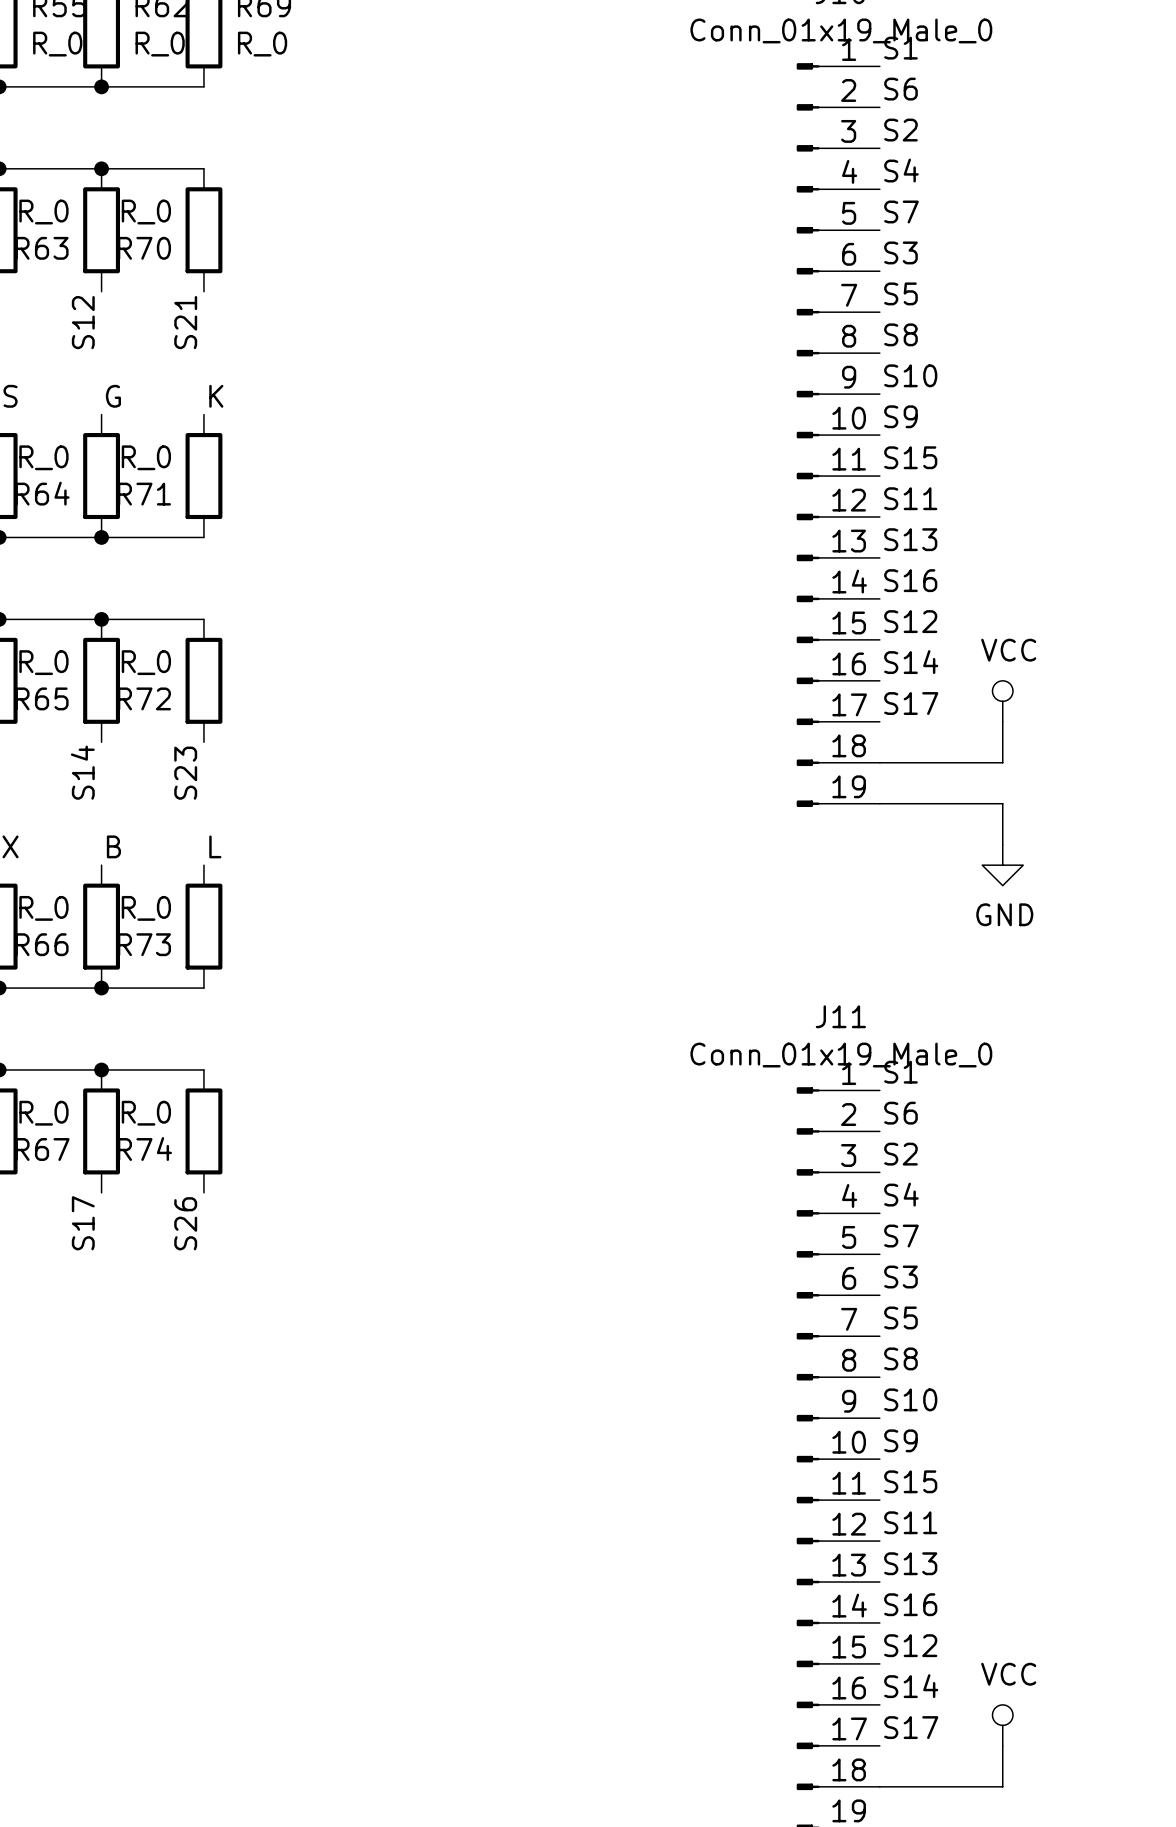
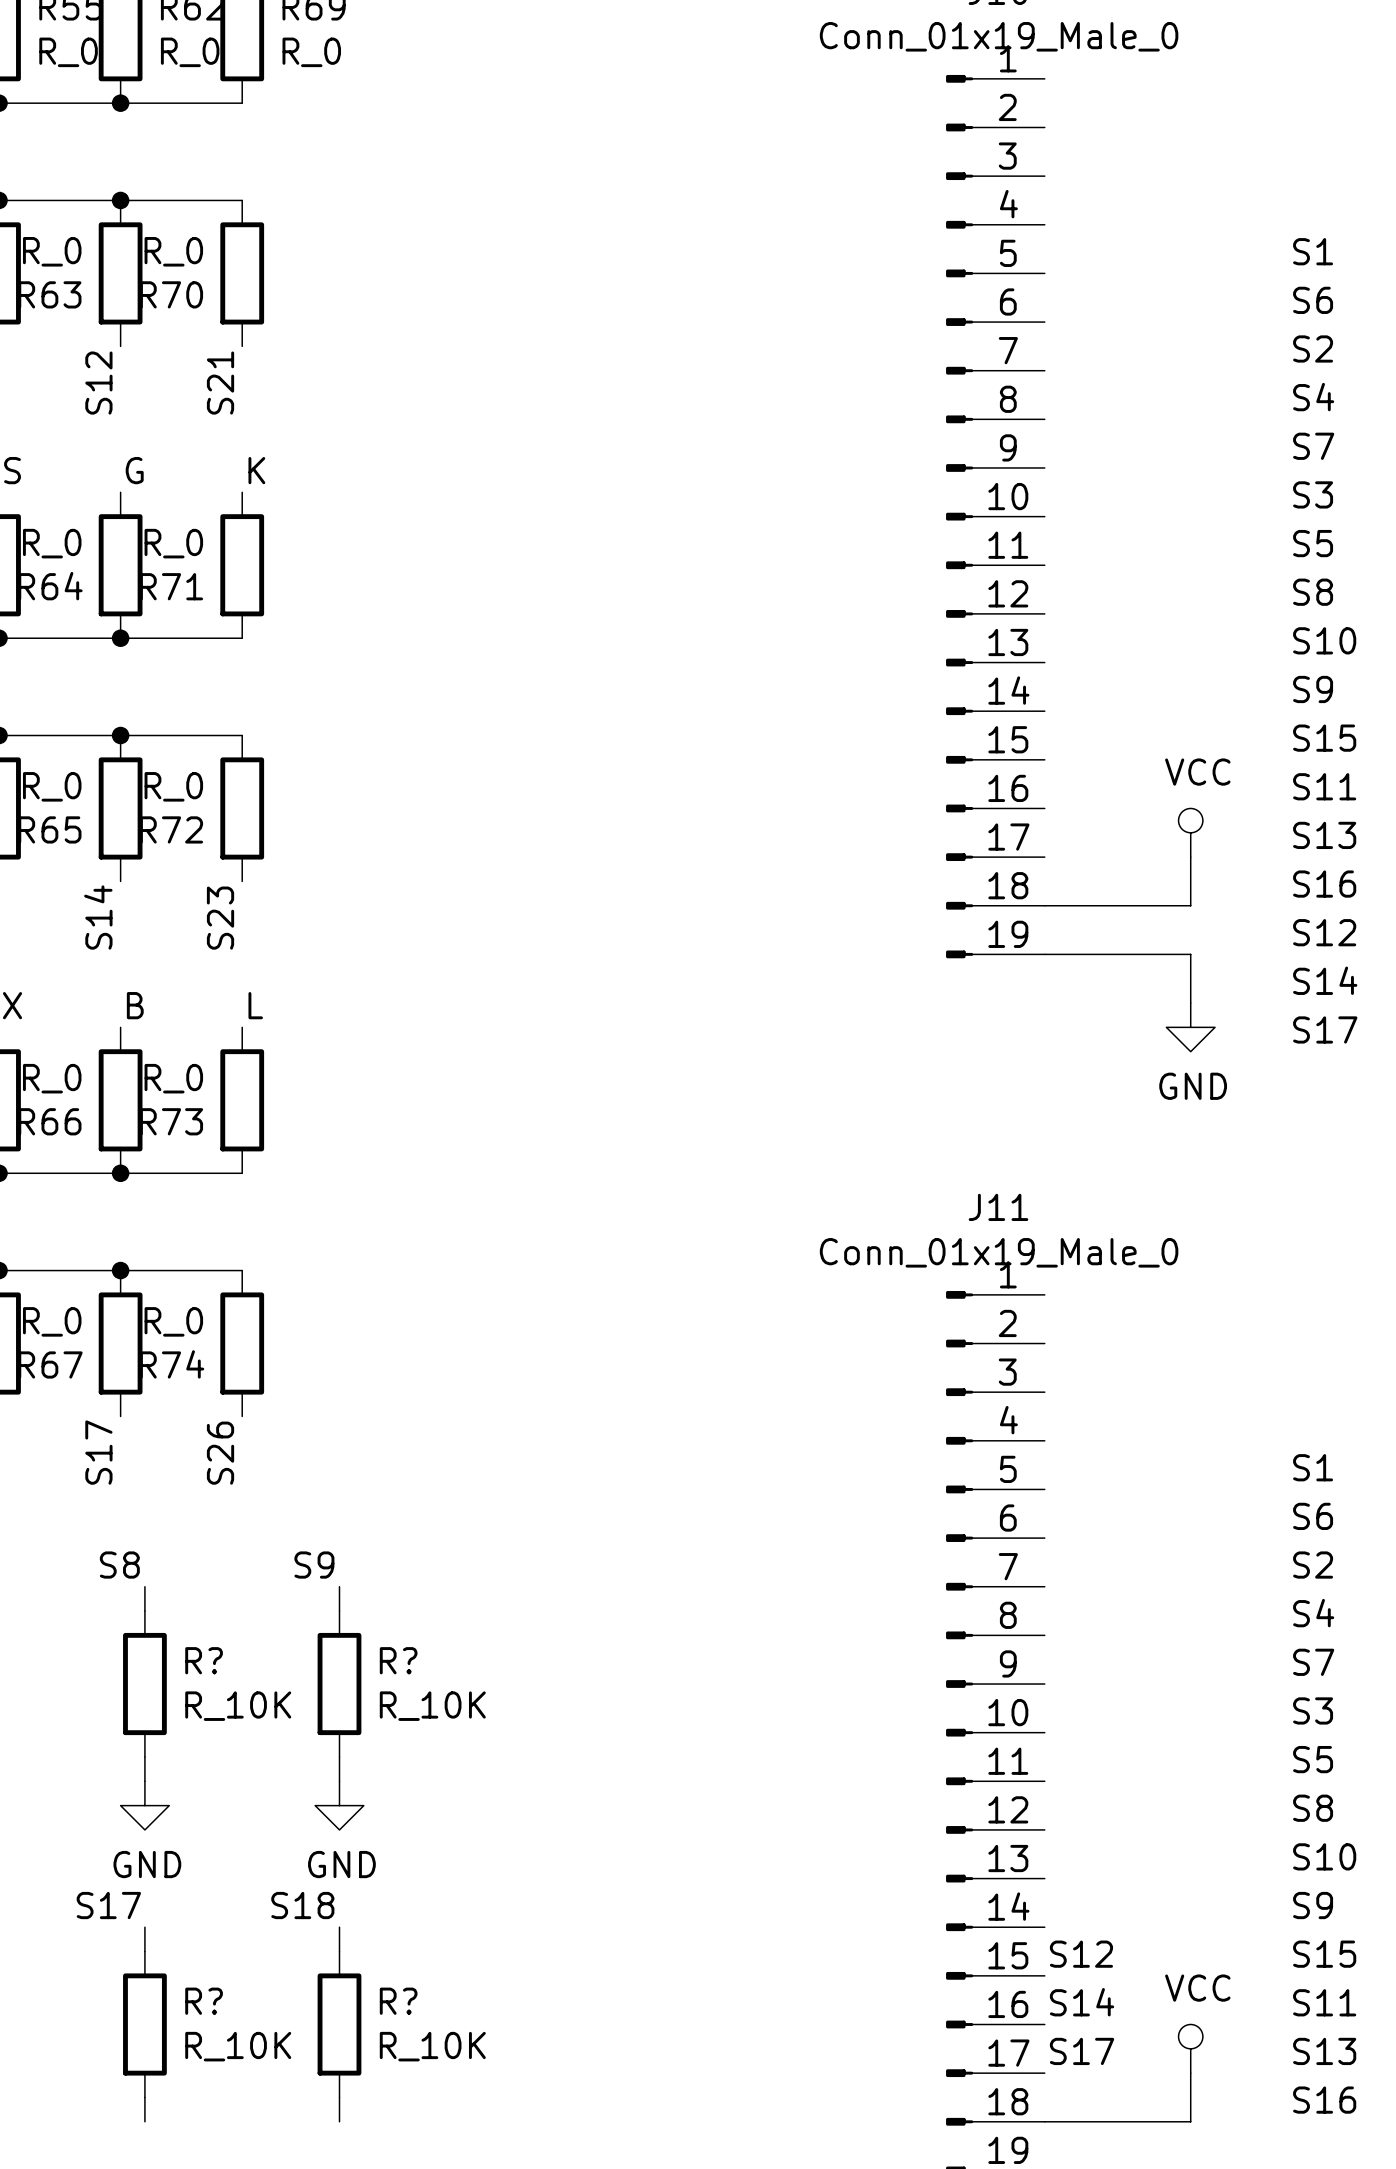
label position: S1 (900, 48) -> S1 (1313, 251)
label position: S6 (900, 89) -> S6 (1313, 300)
label position: S2 (900, 130) -> S2 (1313, 348)
label position: S4 (901, 170) -> S4 (1313, 397)
label position: S7 (901, 211) -> S7 (1313, 446)
label position: S3 (900, 252) -> S3 (1313, 494)
label position: S5 (900, 293) -> S5 (1313, 543)
label position: S8 (900, 334) -> S8 (1313, 592)
label position: S10 (910, 375) -> S10 (1324, 640)
label position: S9 (900, 416) -> S9 (1313, 689)
label position: S15 (910, 457) -> S15 (1324, 738)
label position: S11 (910, 498) -> S11 (1324, 786)
label position: S13 (910, 539) -> S13 (1324, 835)
label position: S16 (910, 580) -> S16 (1324, 884)
label position: S12 (910, 621) -> S12 (1324, 932)
label position: S14 (911, 662) -> S14 (1325, 980)
label position: S17 (911, 703) -> S17 (1325, 1029)
label position: S1 (900, 1072) -> S1 (1313, 1467)
label position: S6 (900, 1113) -> S6 (1313, 1516)
label position: S2 (900, 1154) -> S2 (1313, 1565)
label position: S4 (901, 1194) -> S4 (1313, 1613)
label position: S7 (901, 1236) -> S7 (1313, 1662)
label position: S3 (900, 1277) -> S3 (1313, 1710)
label: none -> S8 (119, 1565)
label: none -> S9 (314, 1565)
label position: S5 (900, 1317) -> S5 (1313, 1759)
wire: none -> (144, 1586) (144, 1611)
wire: none -> (339, 1586) (339, 1611)
label position: S8 (900, 1358) -> S8 (1313, 1808)
label position: S10 (910, 1399) -> S10 (1324, 1856)
R?: none -> R_10K (144, 1684)
R?: none -> R_10K (339, 1684)
label position: S9 (900, 1440) -> S9 (1313, 1905)
wire: none -> (144, 1756) (144, 1781)
wire: none -> (339, 1756) (339, 1781)
label position: S15 (910, 1481) -> S15 (1324, 1954)
power symbol: none -> GND (144, 1805)
power symbol: none -> GND (339, 1805)
label position: S11 (910, 1522) -> S11 (1324, 2002)
label position: S13 (910, 1563) -> S13 (1324, 2051)
label: none -> S17 (108, 1905)
label: none -> S18 (302, 1905)
label position: S16 (910, 1604) -> S16 (1324, 2100)
wire: none -> (144, 1927) (144, 1951)
wire: none -> (339, 1927) (339, 1951)
R?: none -> R_10K (144, 2024)
R?: none -> R_10K (339, 2024)
wire: none -> (144, 2097) (144, 2121)
wire: none -> (339, 2097) (339, 2121)

